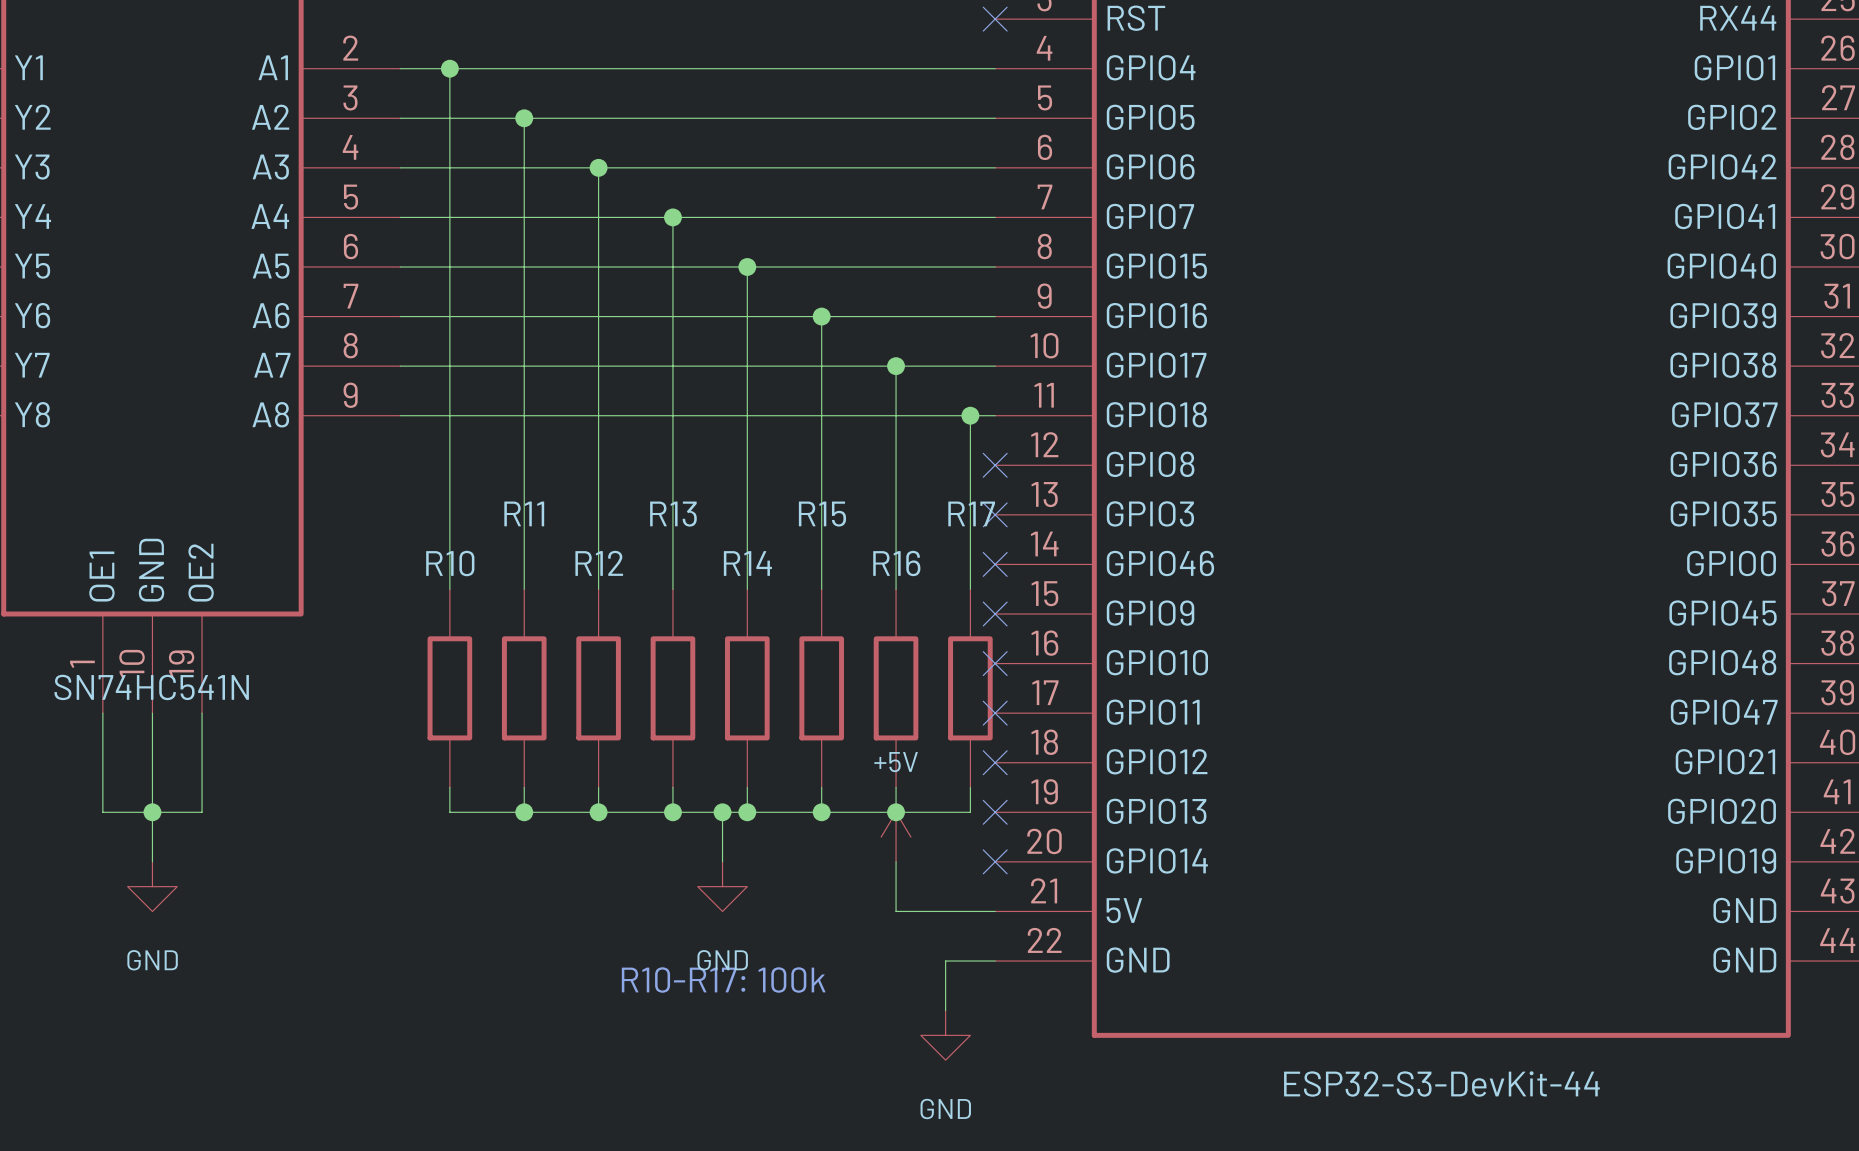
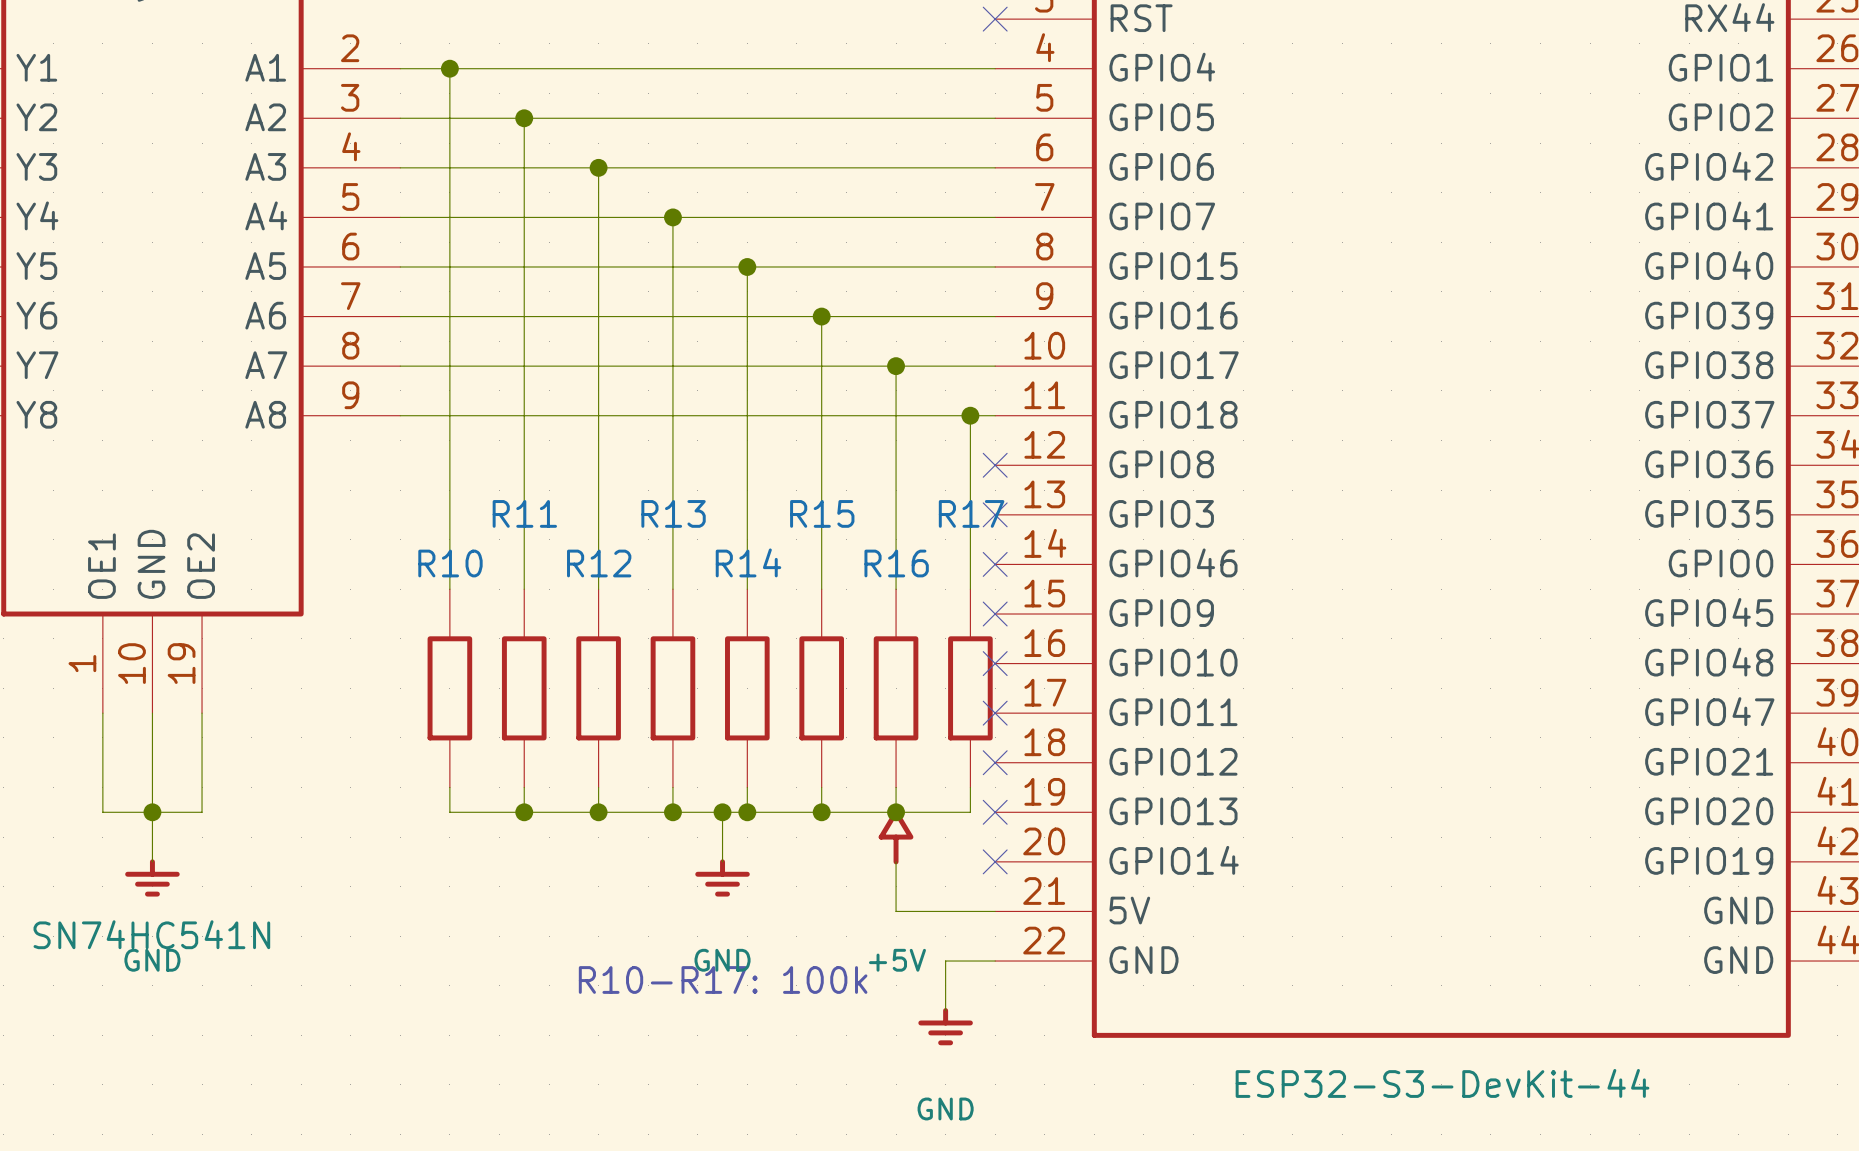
part value position: SN74HC541N (151, 687) -> SN74HC541N (151, 934)
power symbol text position: +5V (896, 762) -> +5V (897, 960)
power symbol shape: [881, 812, 911, 862] -> [878, 809, 914, 865]
power symbol shape: [127, 861, 178, 912] -> [125, 859, 180, 897]
power symbol shape: [697, 861, 748, 912] -> [695, 859, 750, 897]
power symbol shape: [920, 1010, 971, 1061] -> [918, 1008, 973, 1046]

